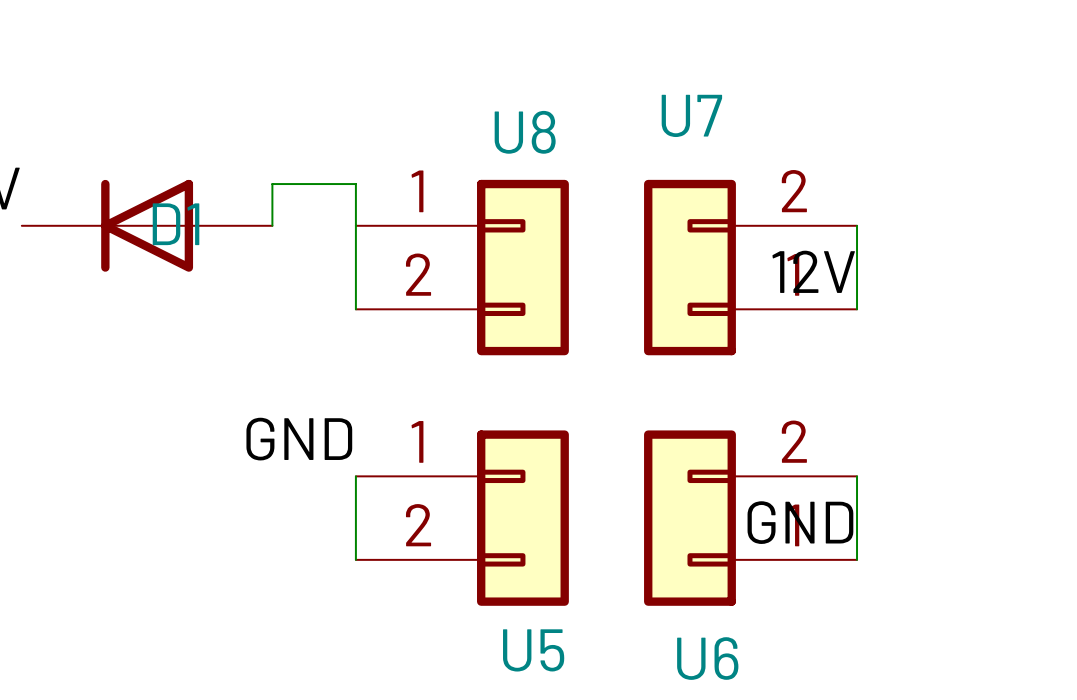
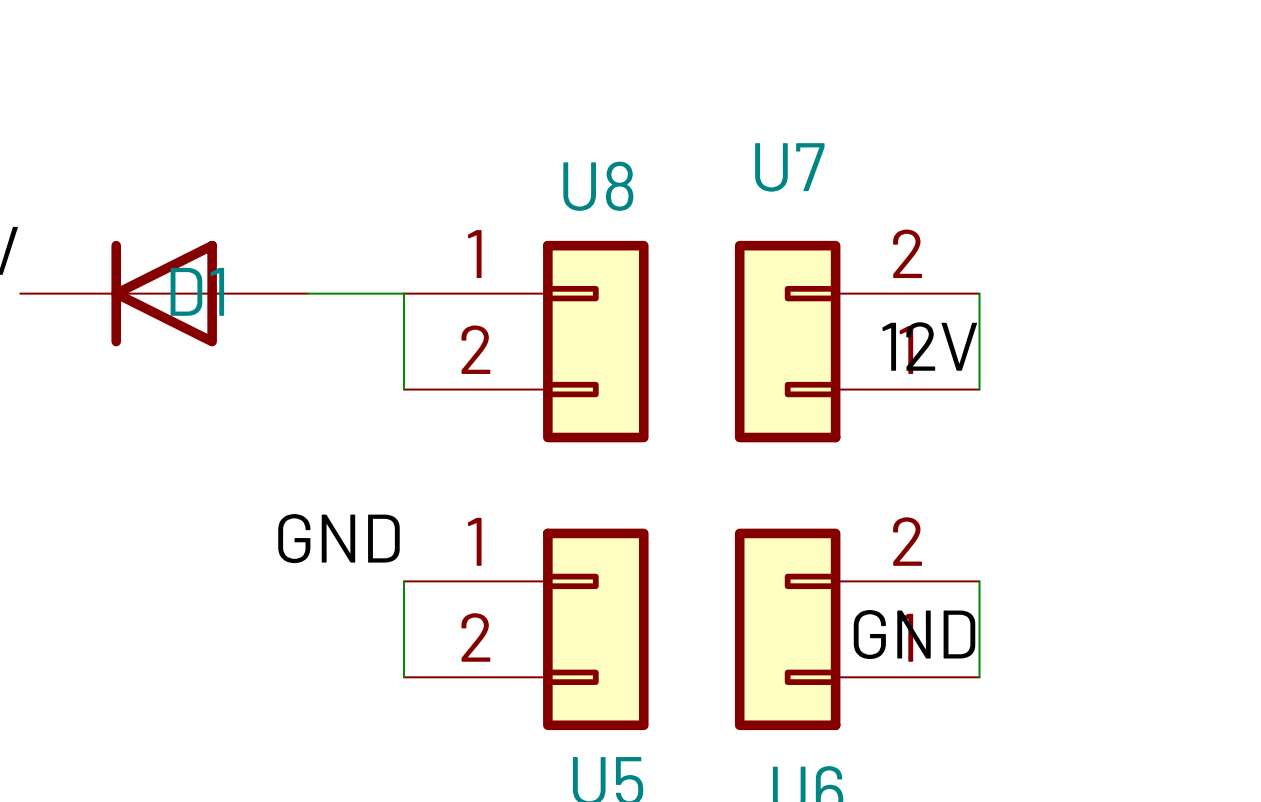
wire: (272, 225) (272, 184) (355, 184) (355, 225) -> (308, 293) (403, 293)

